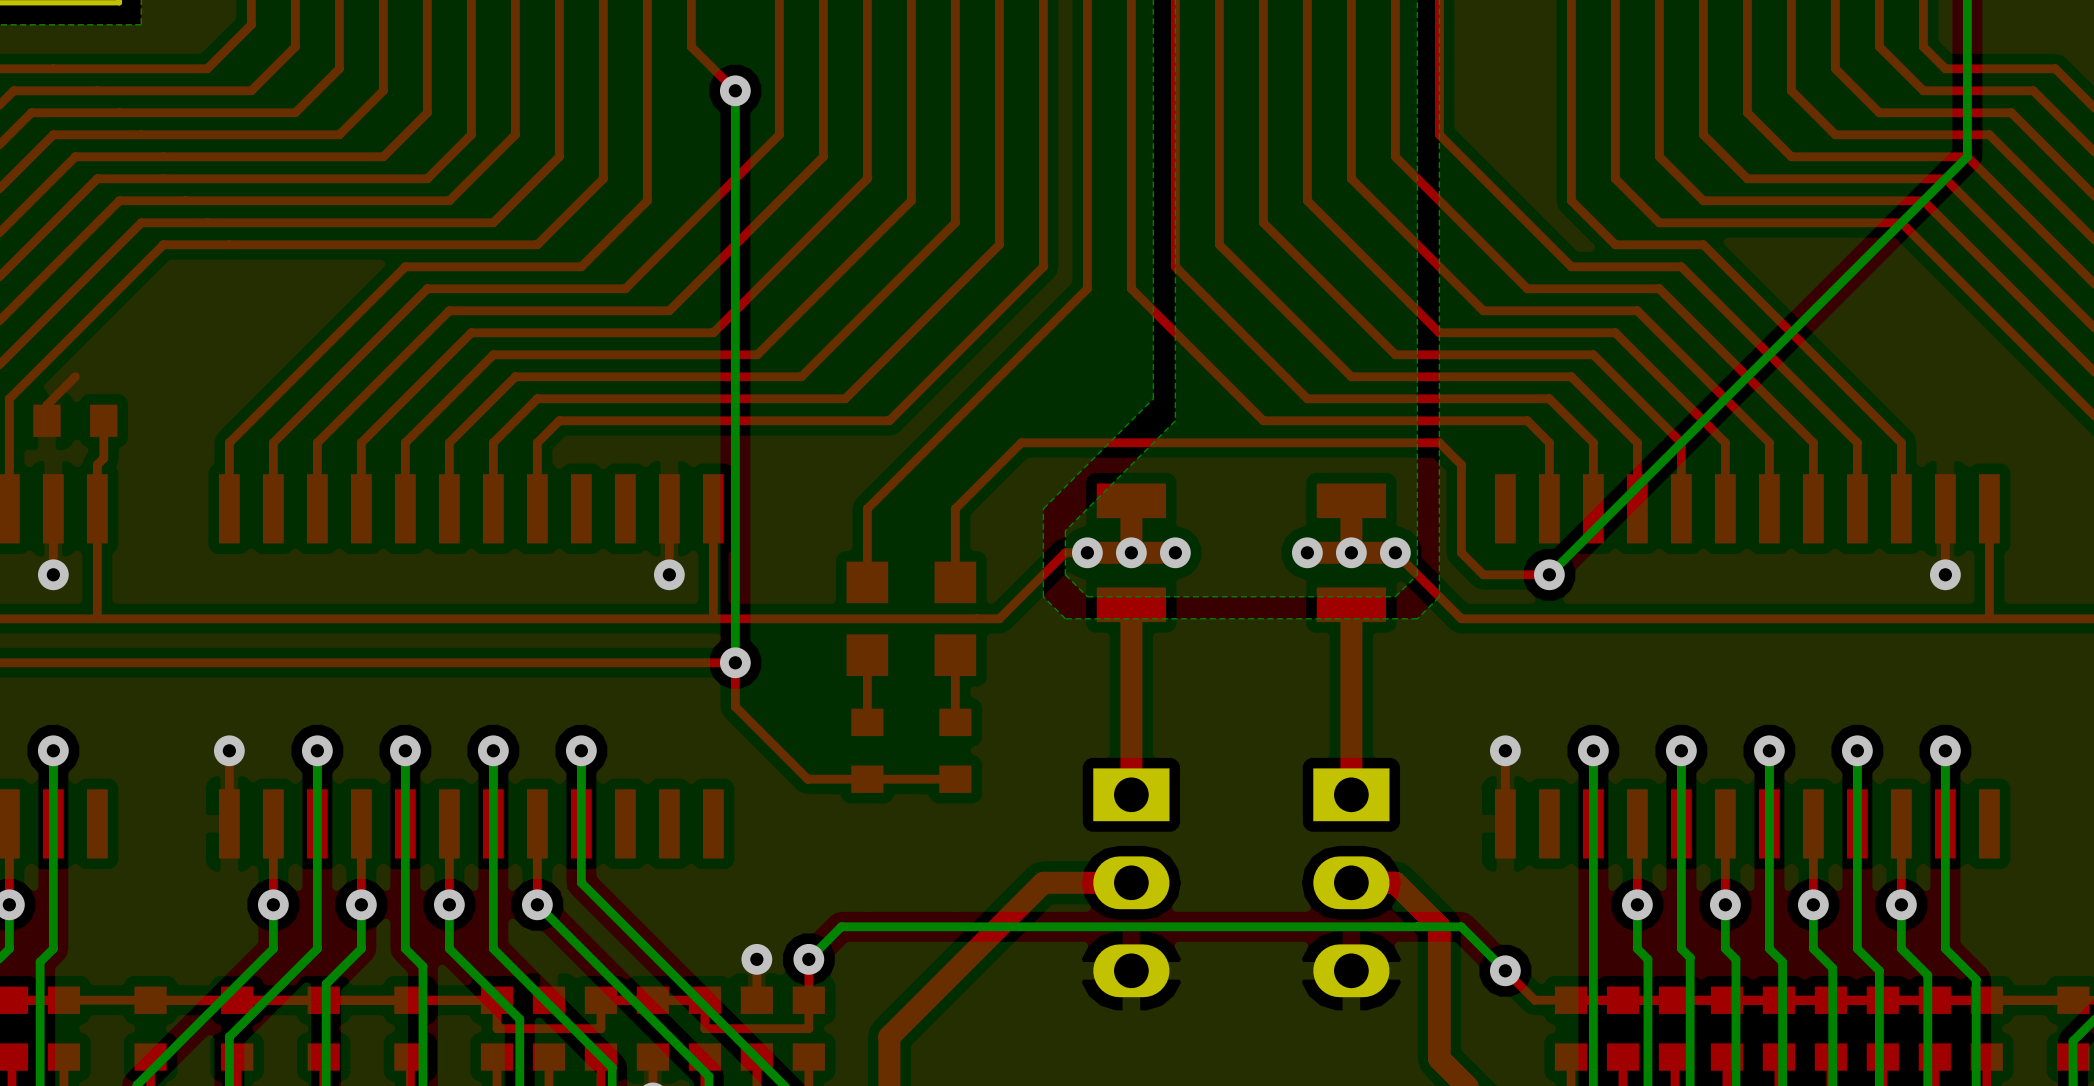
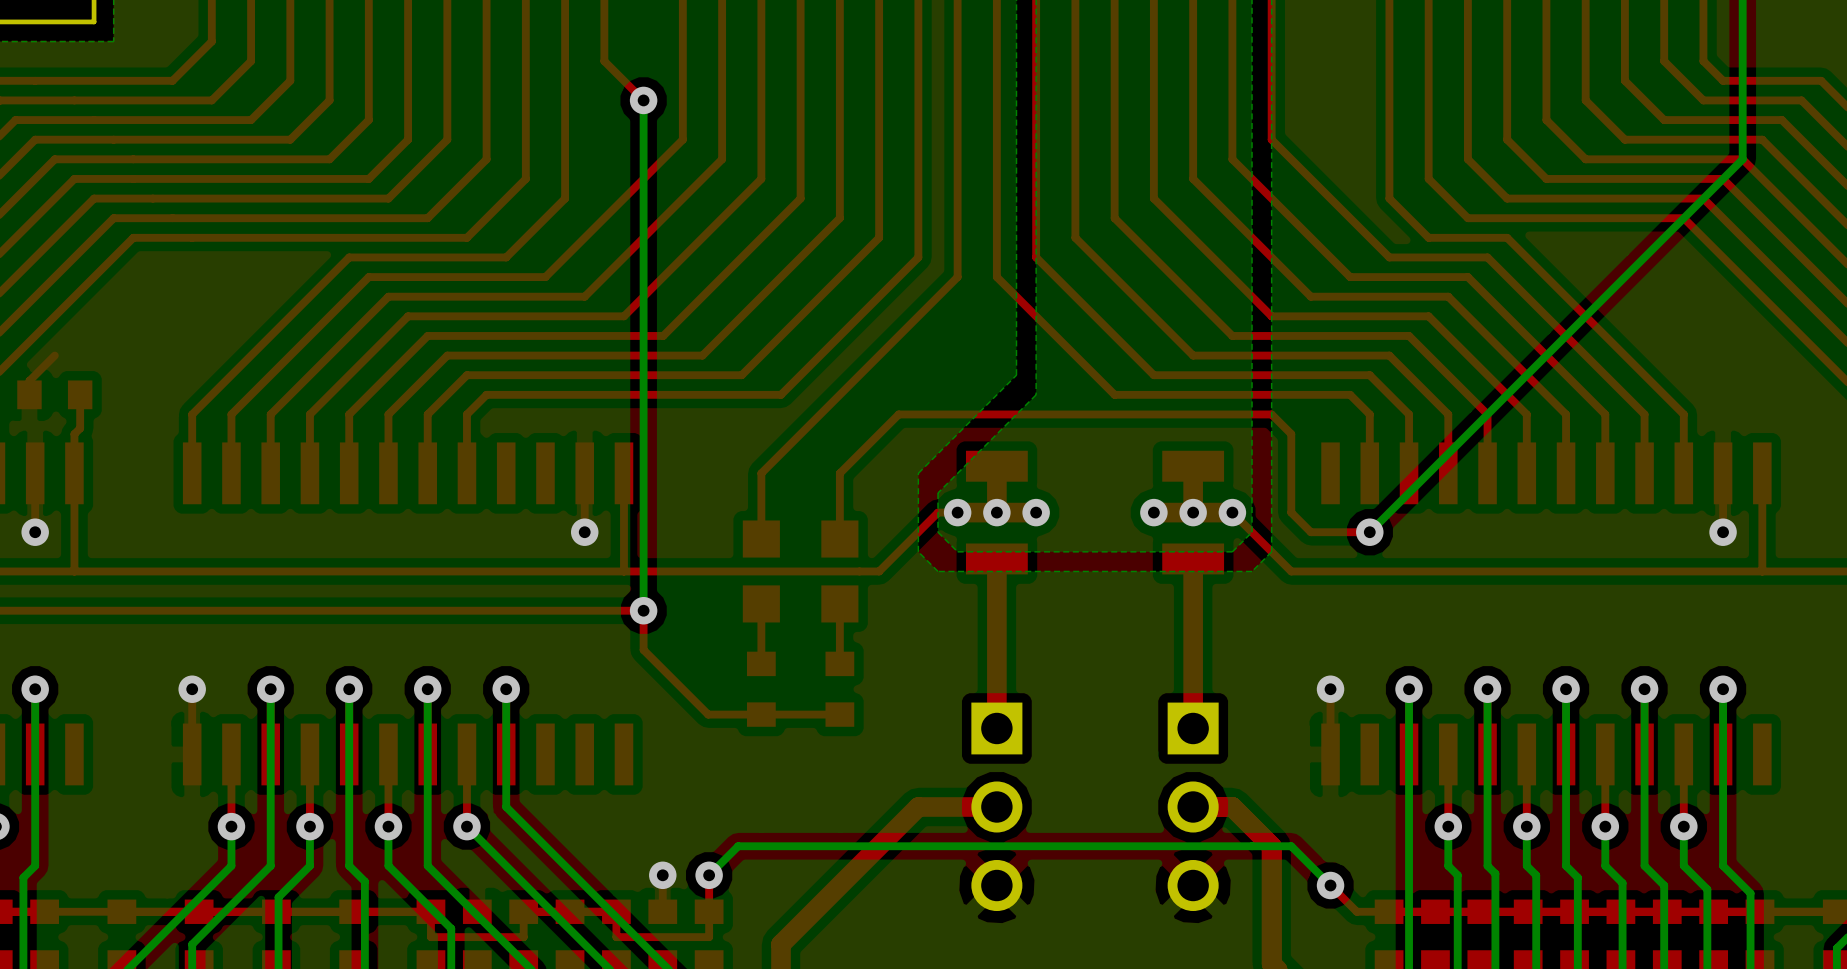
part footprint: [1093, 768, 1170, 998] -> [971, 702, 1023, 912]
part footprint: [1313, 768, 1390, 998] -> [1167, 702, 1219, 912]

